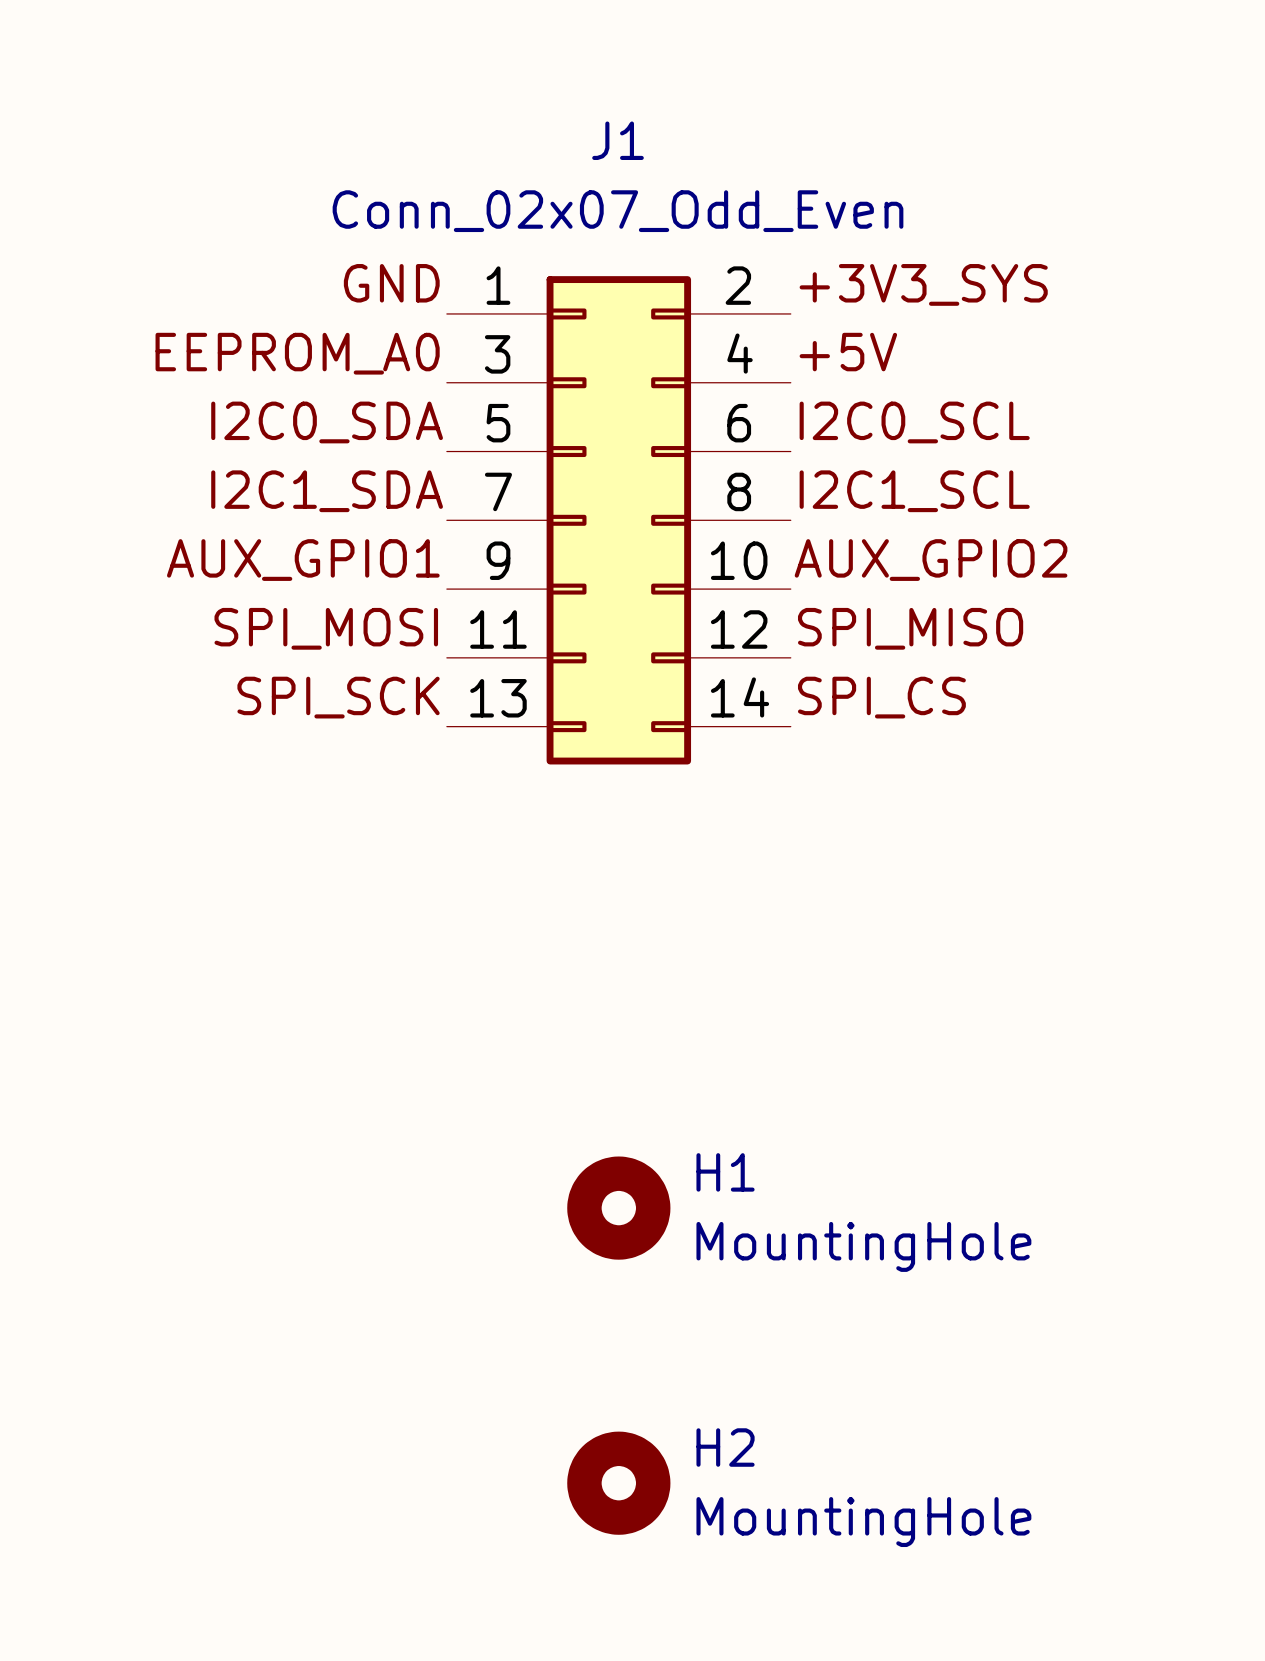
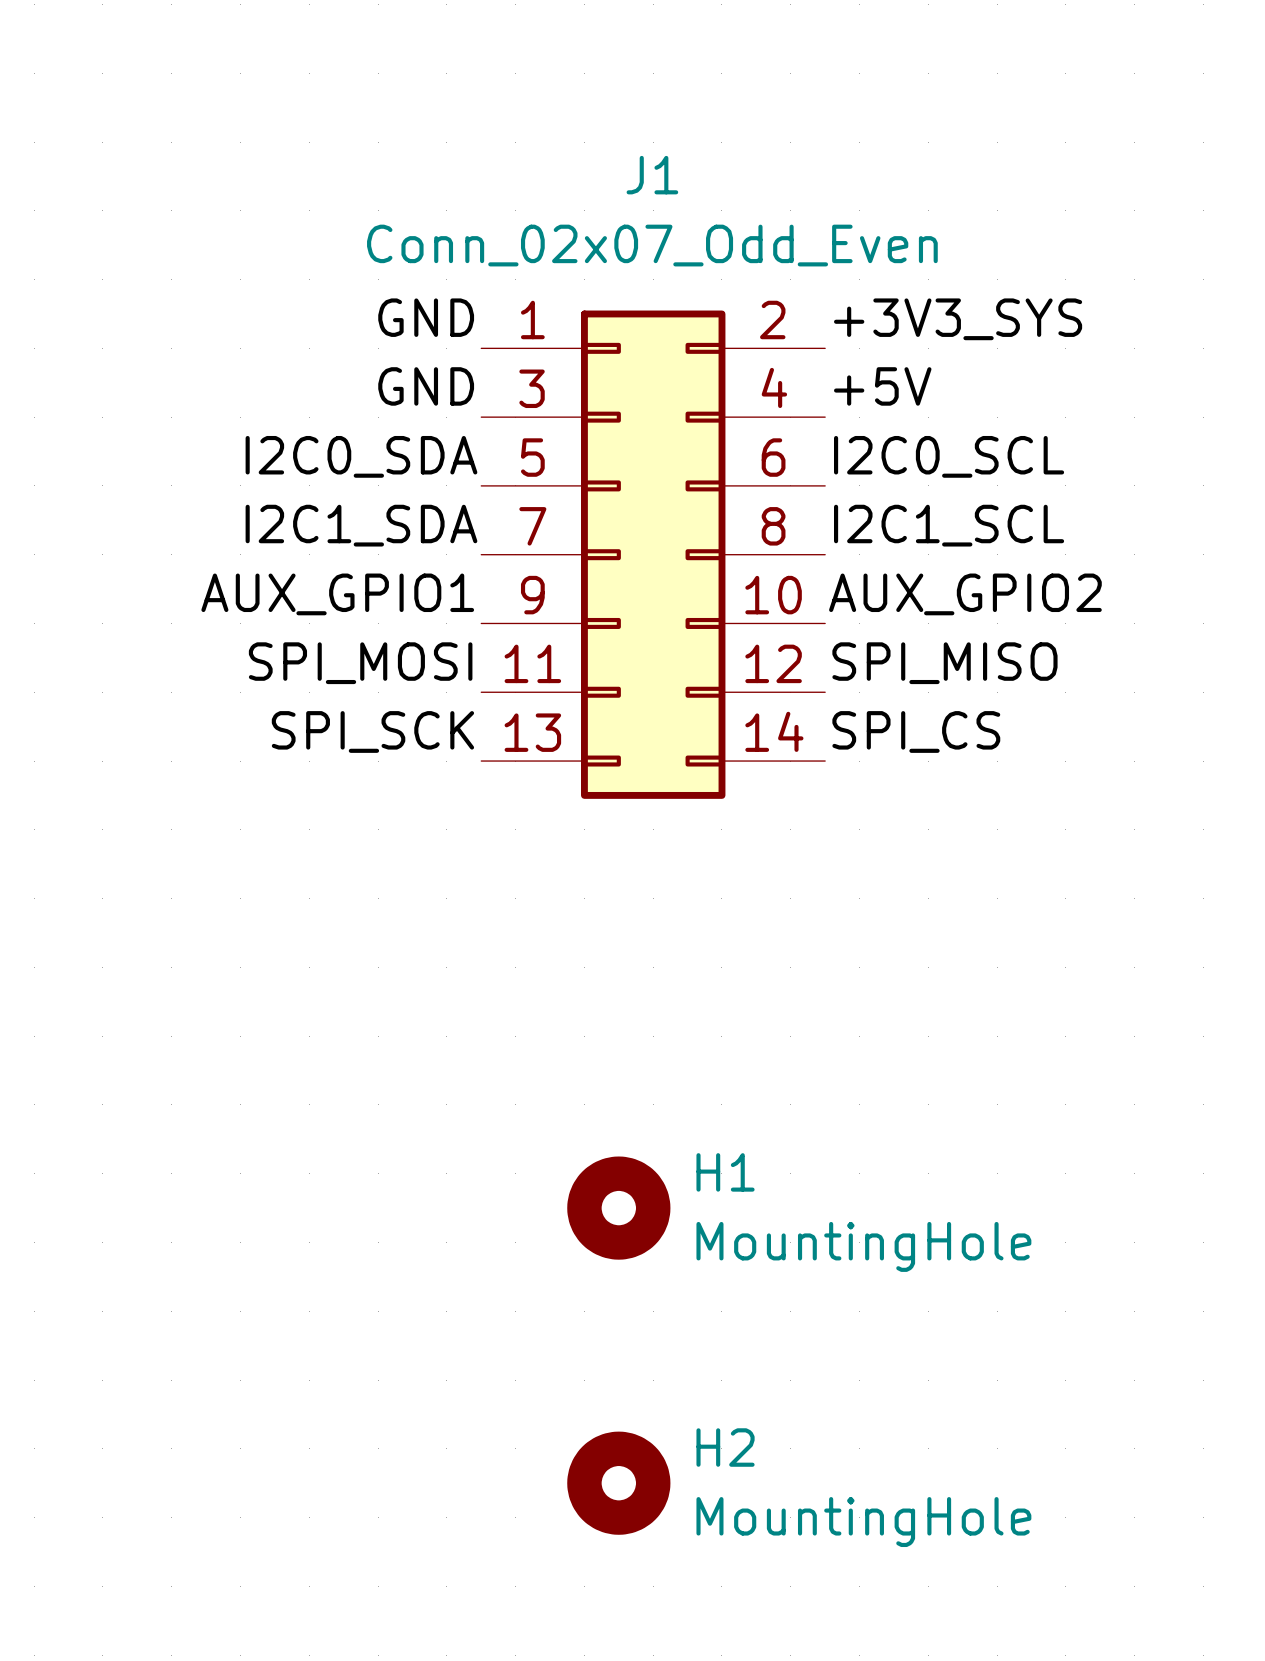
label position: GND (391, 283) -> GND (426, 317)
label position: +3V3_SYS (923, 284) -> +3V3_SYS (958, 319)
label position: +5V (848, 352) -> +5V (882, 386)
label: EEPROM_A0 (297, 353) -> none
label: none -> GND (426, 386)
label position: I2C0_SDA (327, 422) -> I2C0_SDA (361, 456)
label position: I2C0_SCL (914, 422) -> I2C0_SCL (949, 456)
label position: I2C1_SDA (327, 491) -> I2C1_SDA (361, 525)
label position: I2C1_SCL (914, 491) -> I2C1_SCL (949, 525)
J1 position: (618, 520) -> (653, 554)
label position: AUX_GPIO1 (303, 560) -> AUX_GPIO1 (337, 594)
label position: AUX_GPIO2 (931, 560) -> AUX_GPIO2 (965, 594)
label position: SPI_MOSI (326, 628) -> SPI_MOSI (360, 663)
label position: SPI_MISO (910, 628) -> SPI_MISO (944, 663)
label position: SPI_SCK (338, 697) -> SPI_SCK (372, 731)
label position: SPI_CS (881, 697) -> SPI_CS (916, 731)

